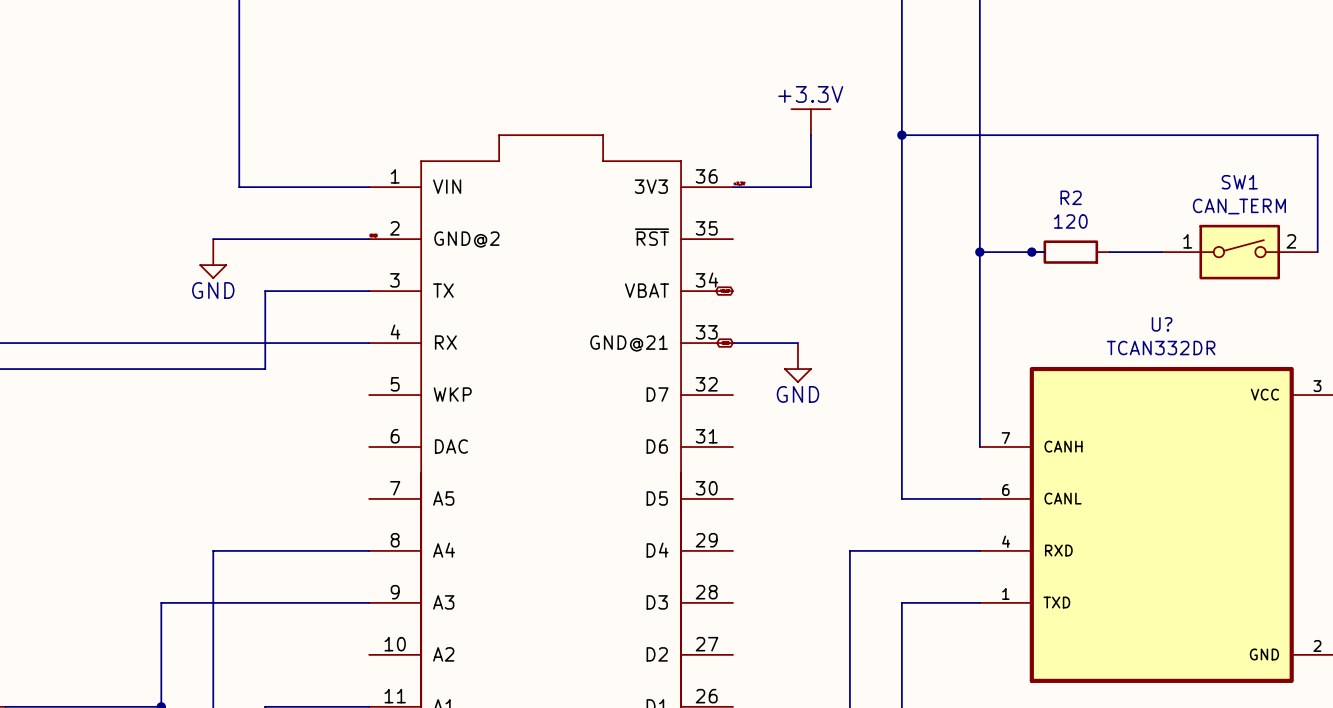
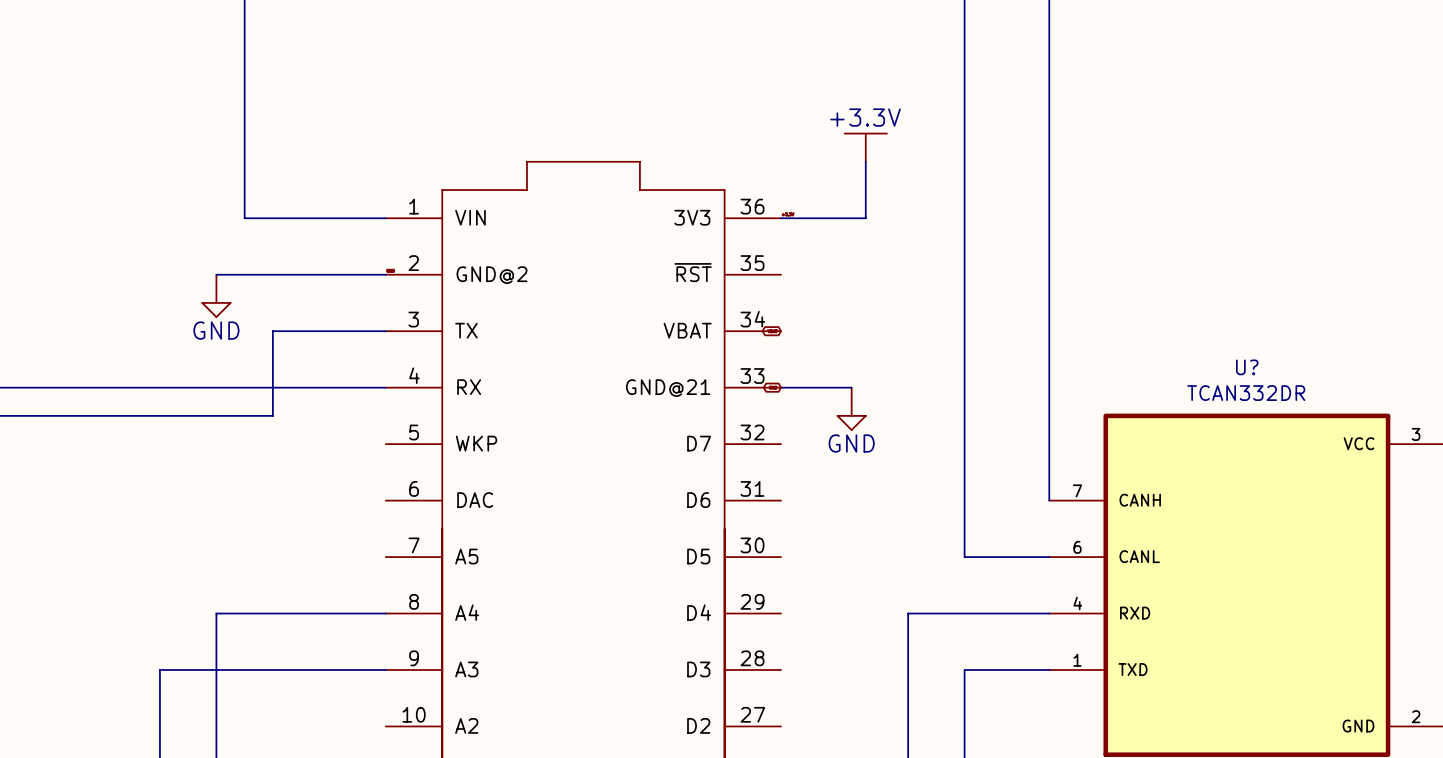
wire: (901, 135) (1317, 135) (1317, 252) -> none
junction: (901, 135) -> none
wire: (979, 252) (1044, 252) -> none
junction: (979, 252) -> none
junction: (1031, 252) -> none
R2: 120 (1070, 252) -> none
wire: (1109, 252) (1161, 252) -> none
SW1: CAN_TERM (1239, 252) -> none

